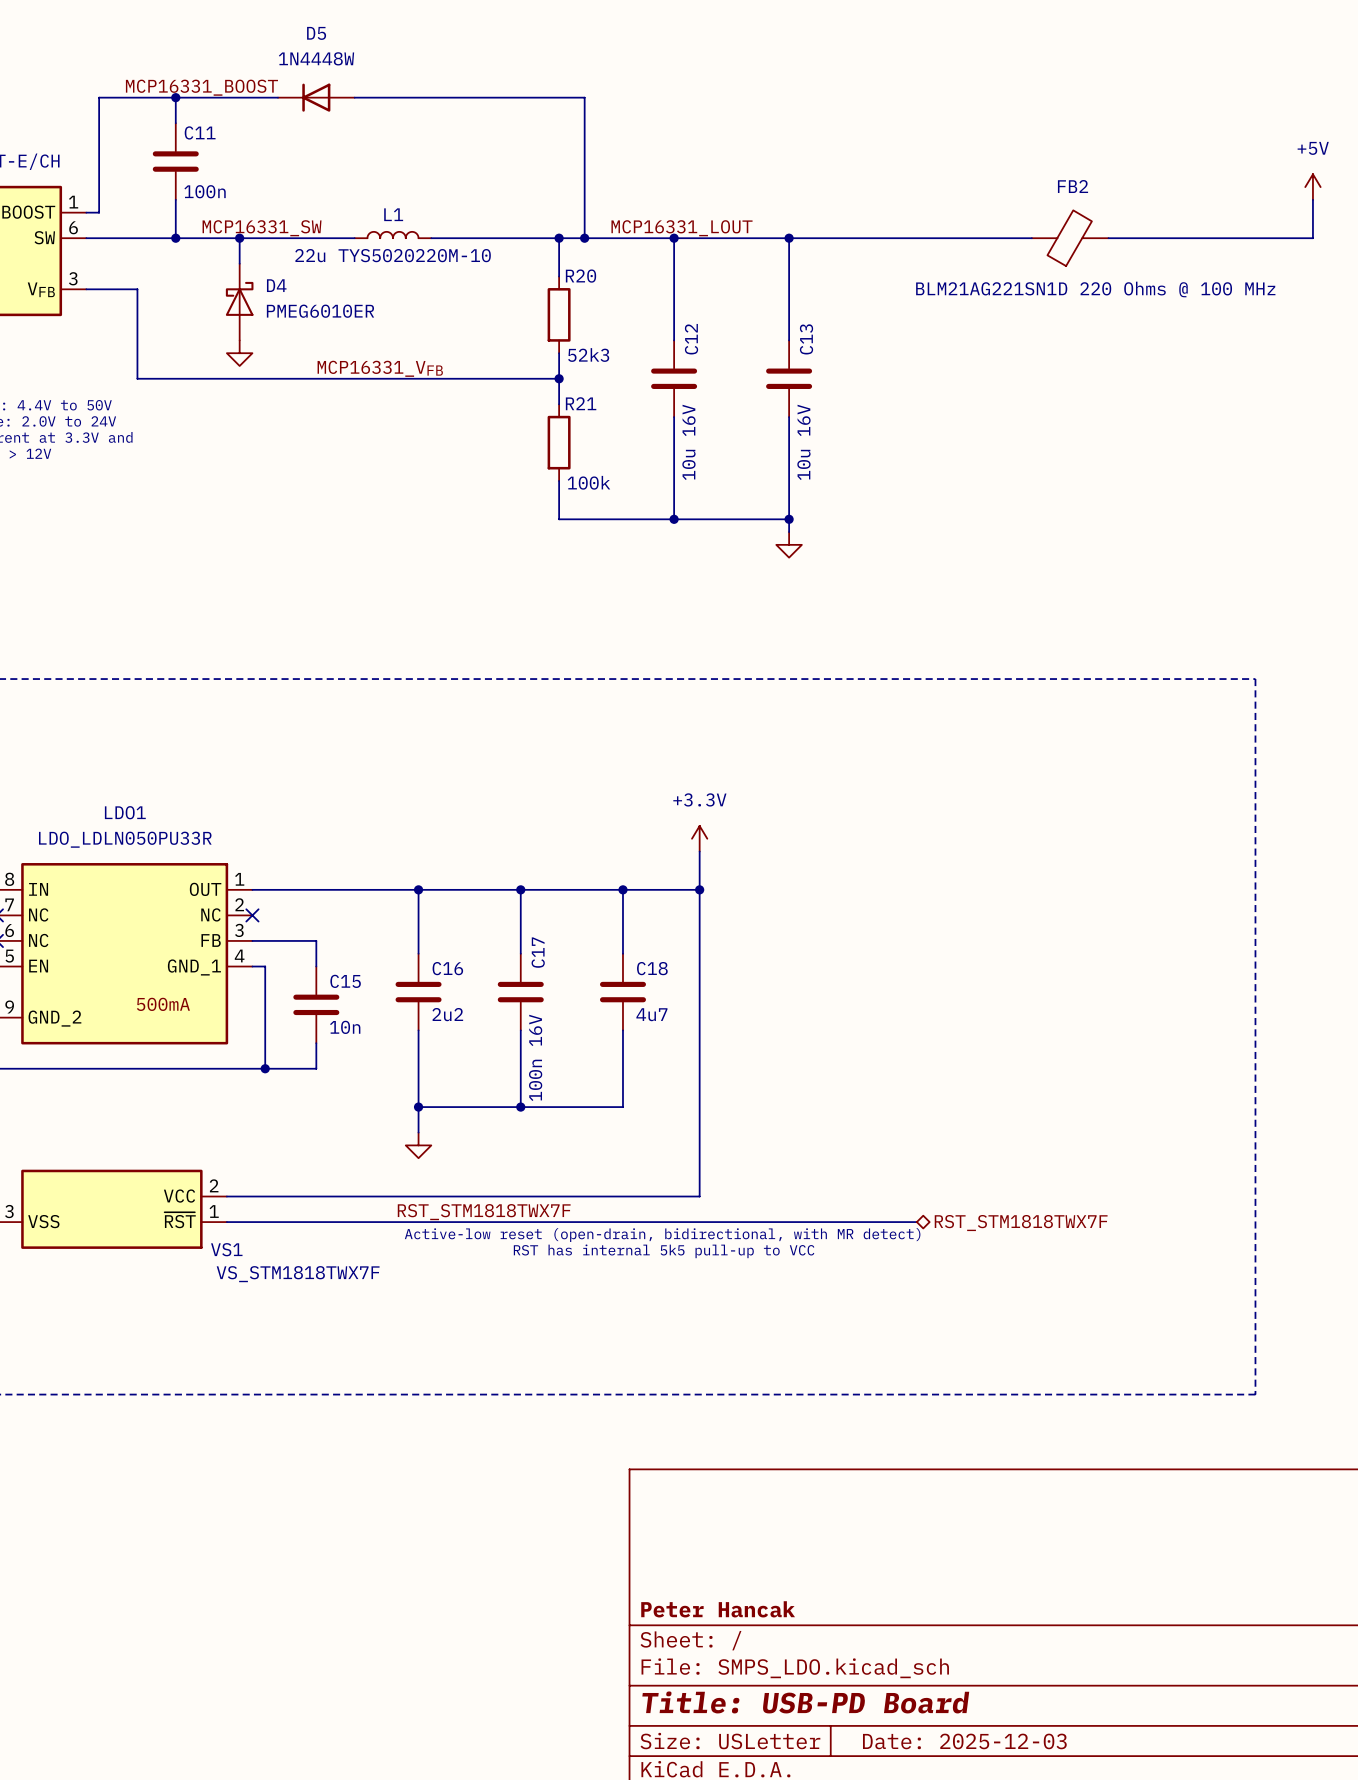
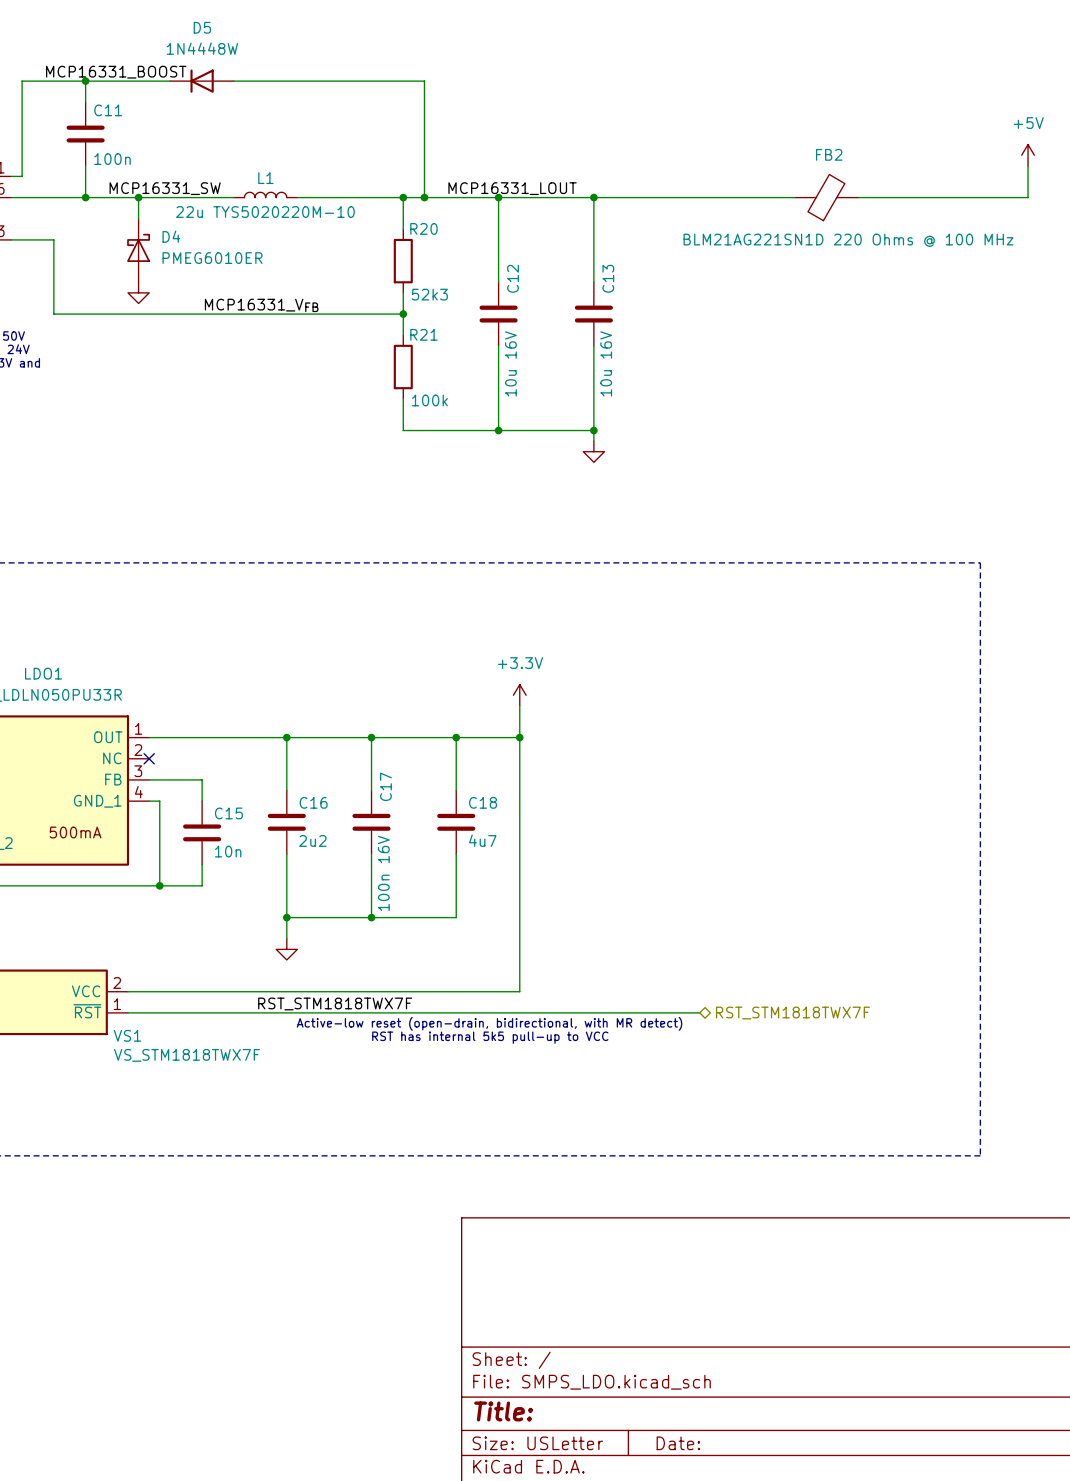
title block: Peter Hancak (718, 1609) -> none
title block: Title: USB-PD Board (805, 1702) -> Title: (503, 1411)
title block: Date: 2025-12-03 (964, 1741) -> Date: (678, 1443)

